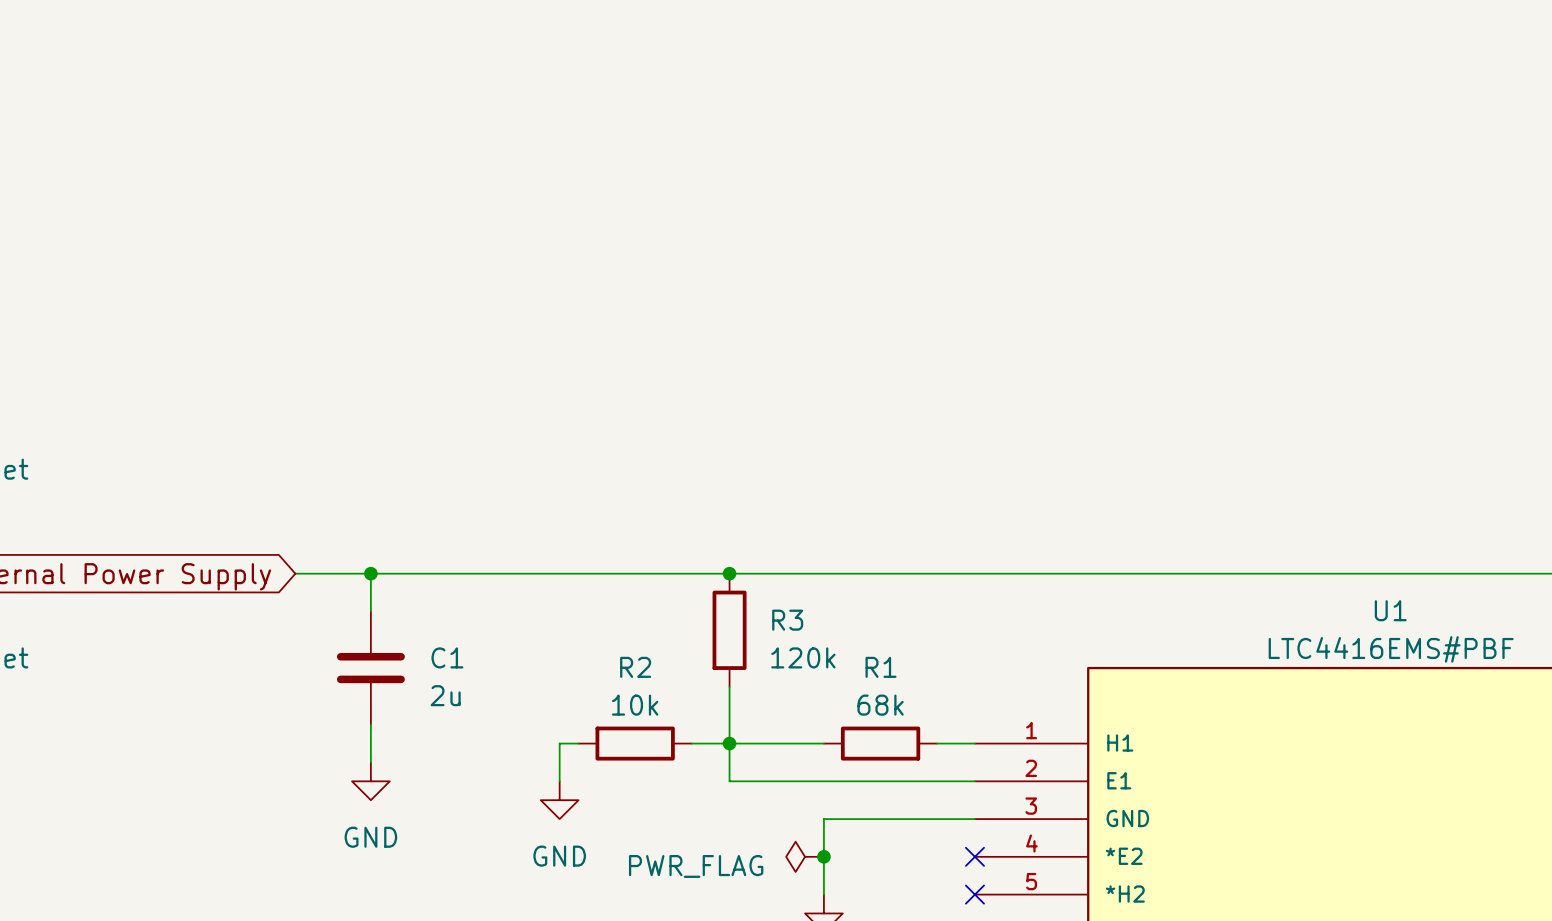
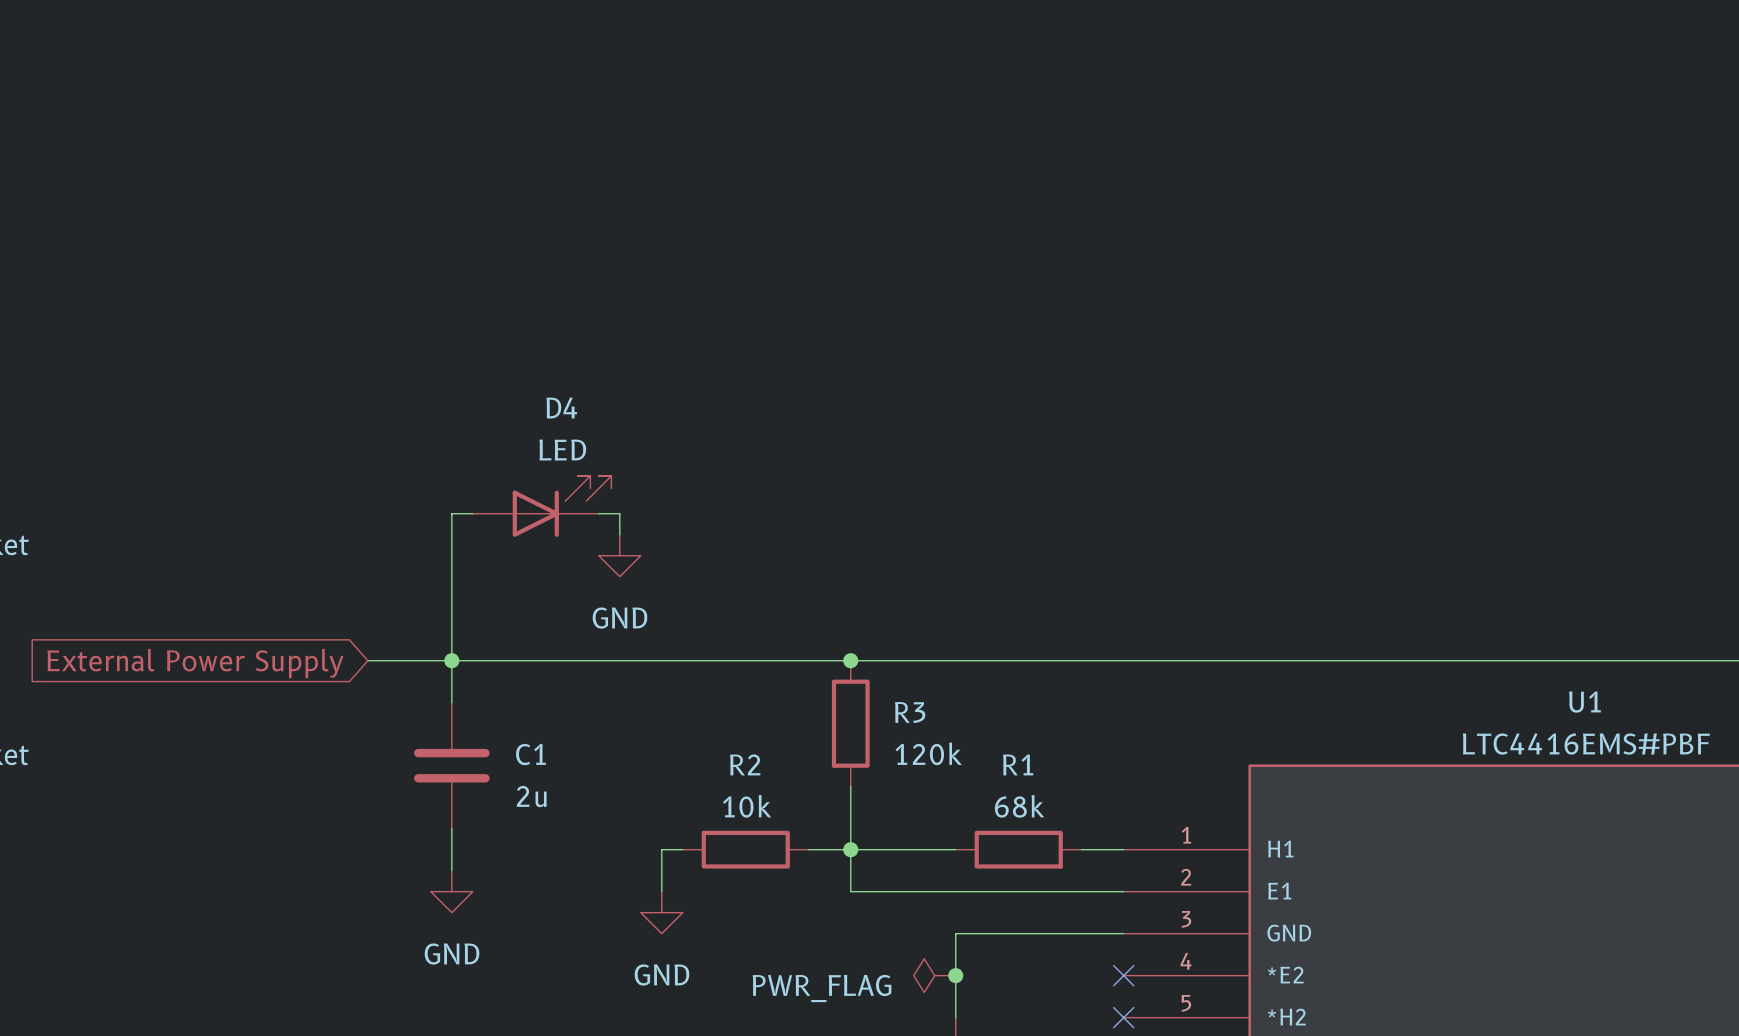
D4: none -> LED (542, 506)
wire: none -> (472, 513) (451, 513) (451, 660)
wire: none -> (598, 513) (619, 513) (619, 534)
power symbol: none -> GND (619, 555)

